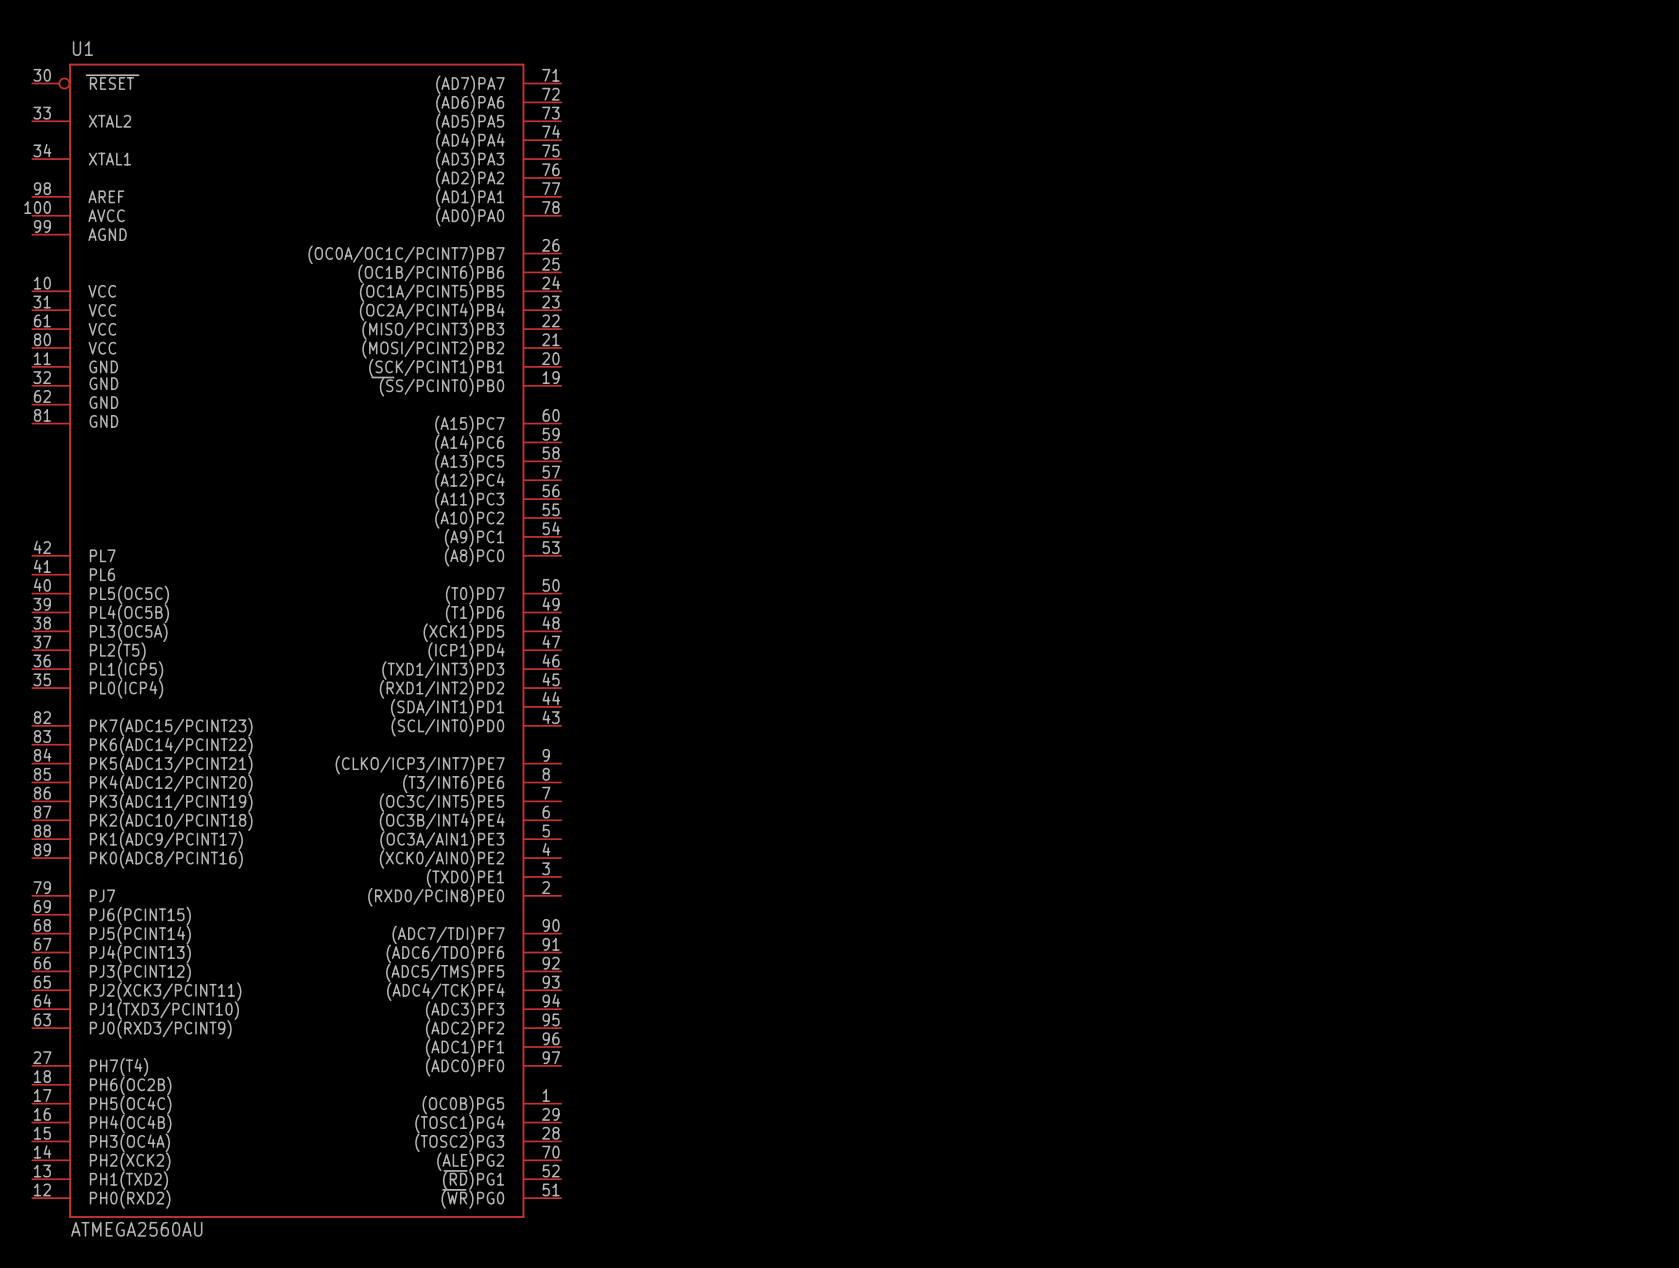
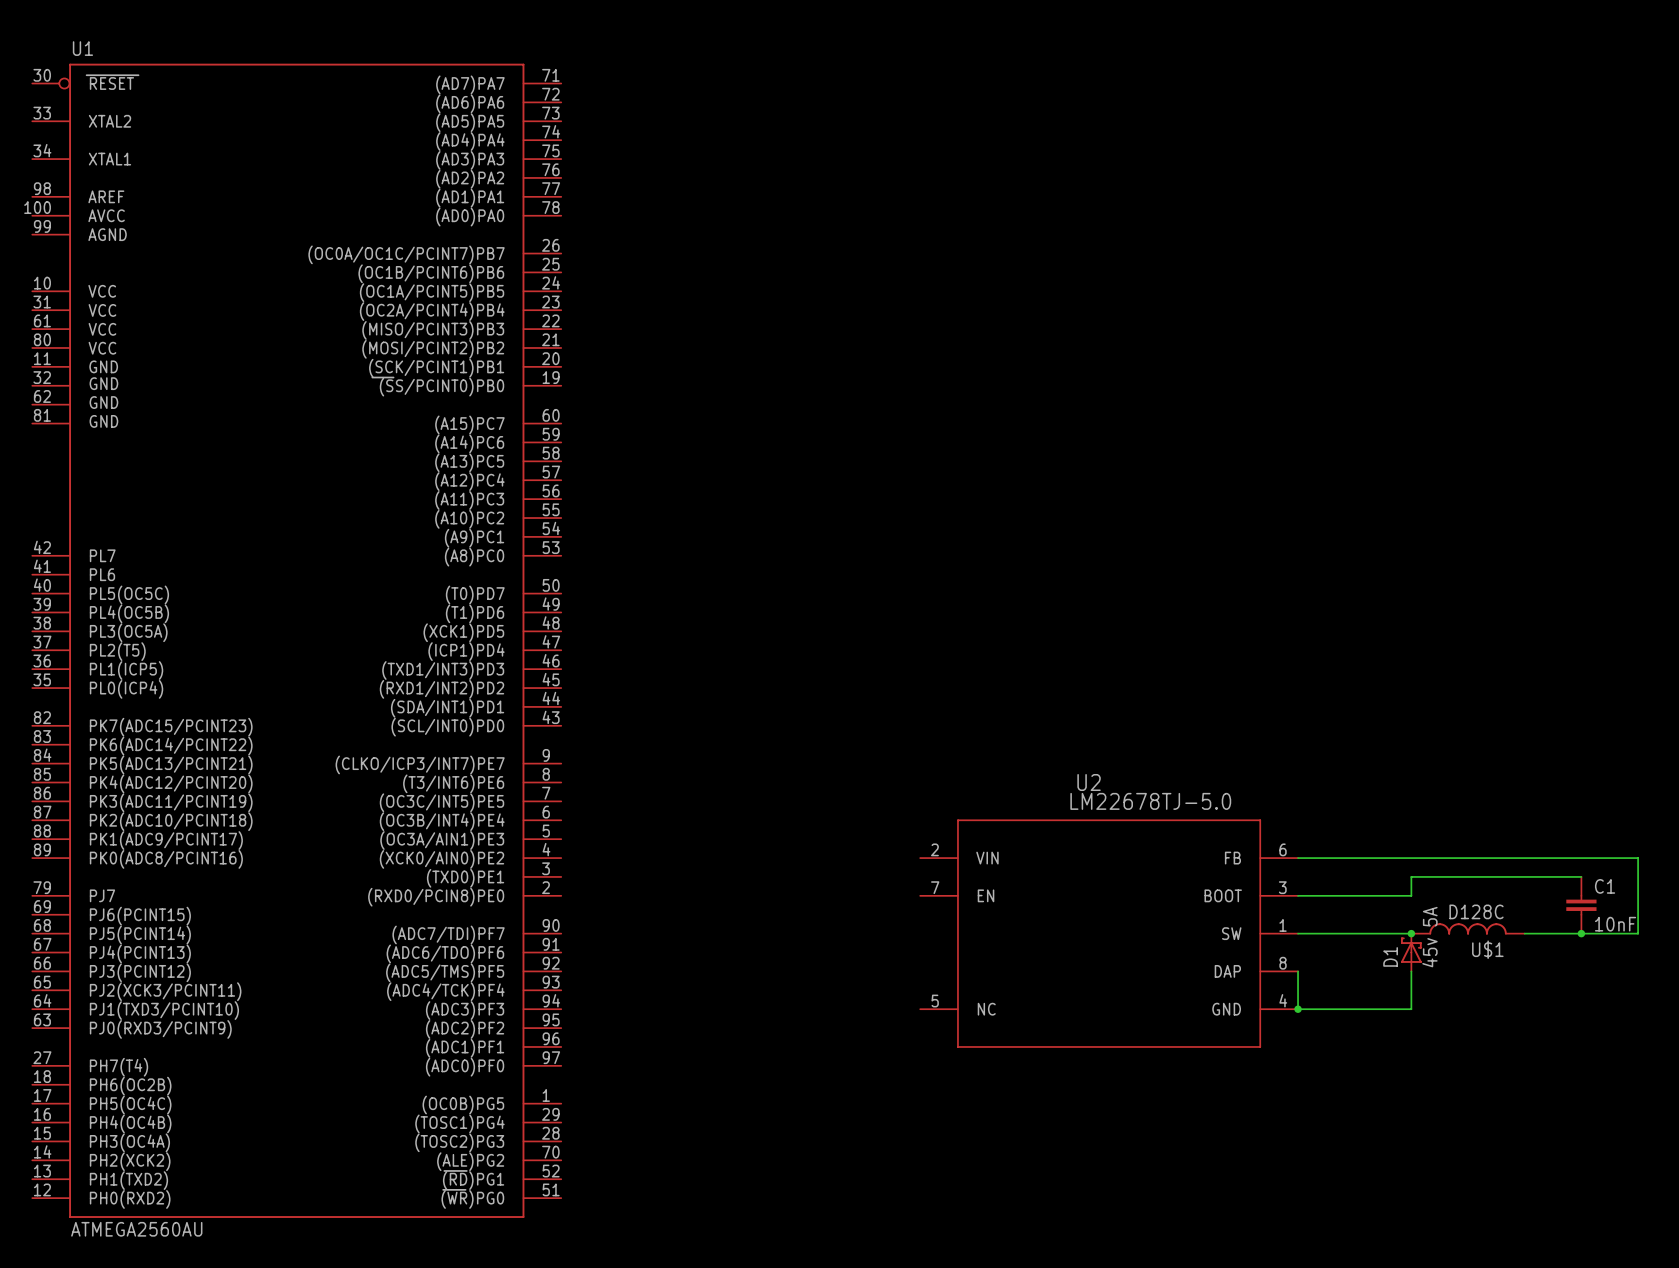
wire: none -> (1298, 858) (1638, 858) (1638, 933) (1524, 933)
wire: none -> (1581, 876) (1411, 876) (1411, 895) (1298, 895)
C1: none -> 10nF (1581, 905)
U$1: none -> D128C (1468, 928)
U2: none -> LM22678TJ-5.0 (1109, 933)
wire: none -> (1298, 933) (1411, 933)
junction: none -> (1411, 933)
junction: none -> (1581, 933)
D1: none -> 45v 5A (1411, 952)
wire: none -> (1298, 971) (1298, 1009) (1411, 1009) (1411, 971)
junction: none -> (1298, 1009)

